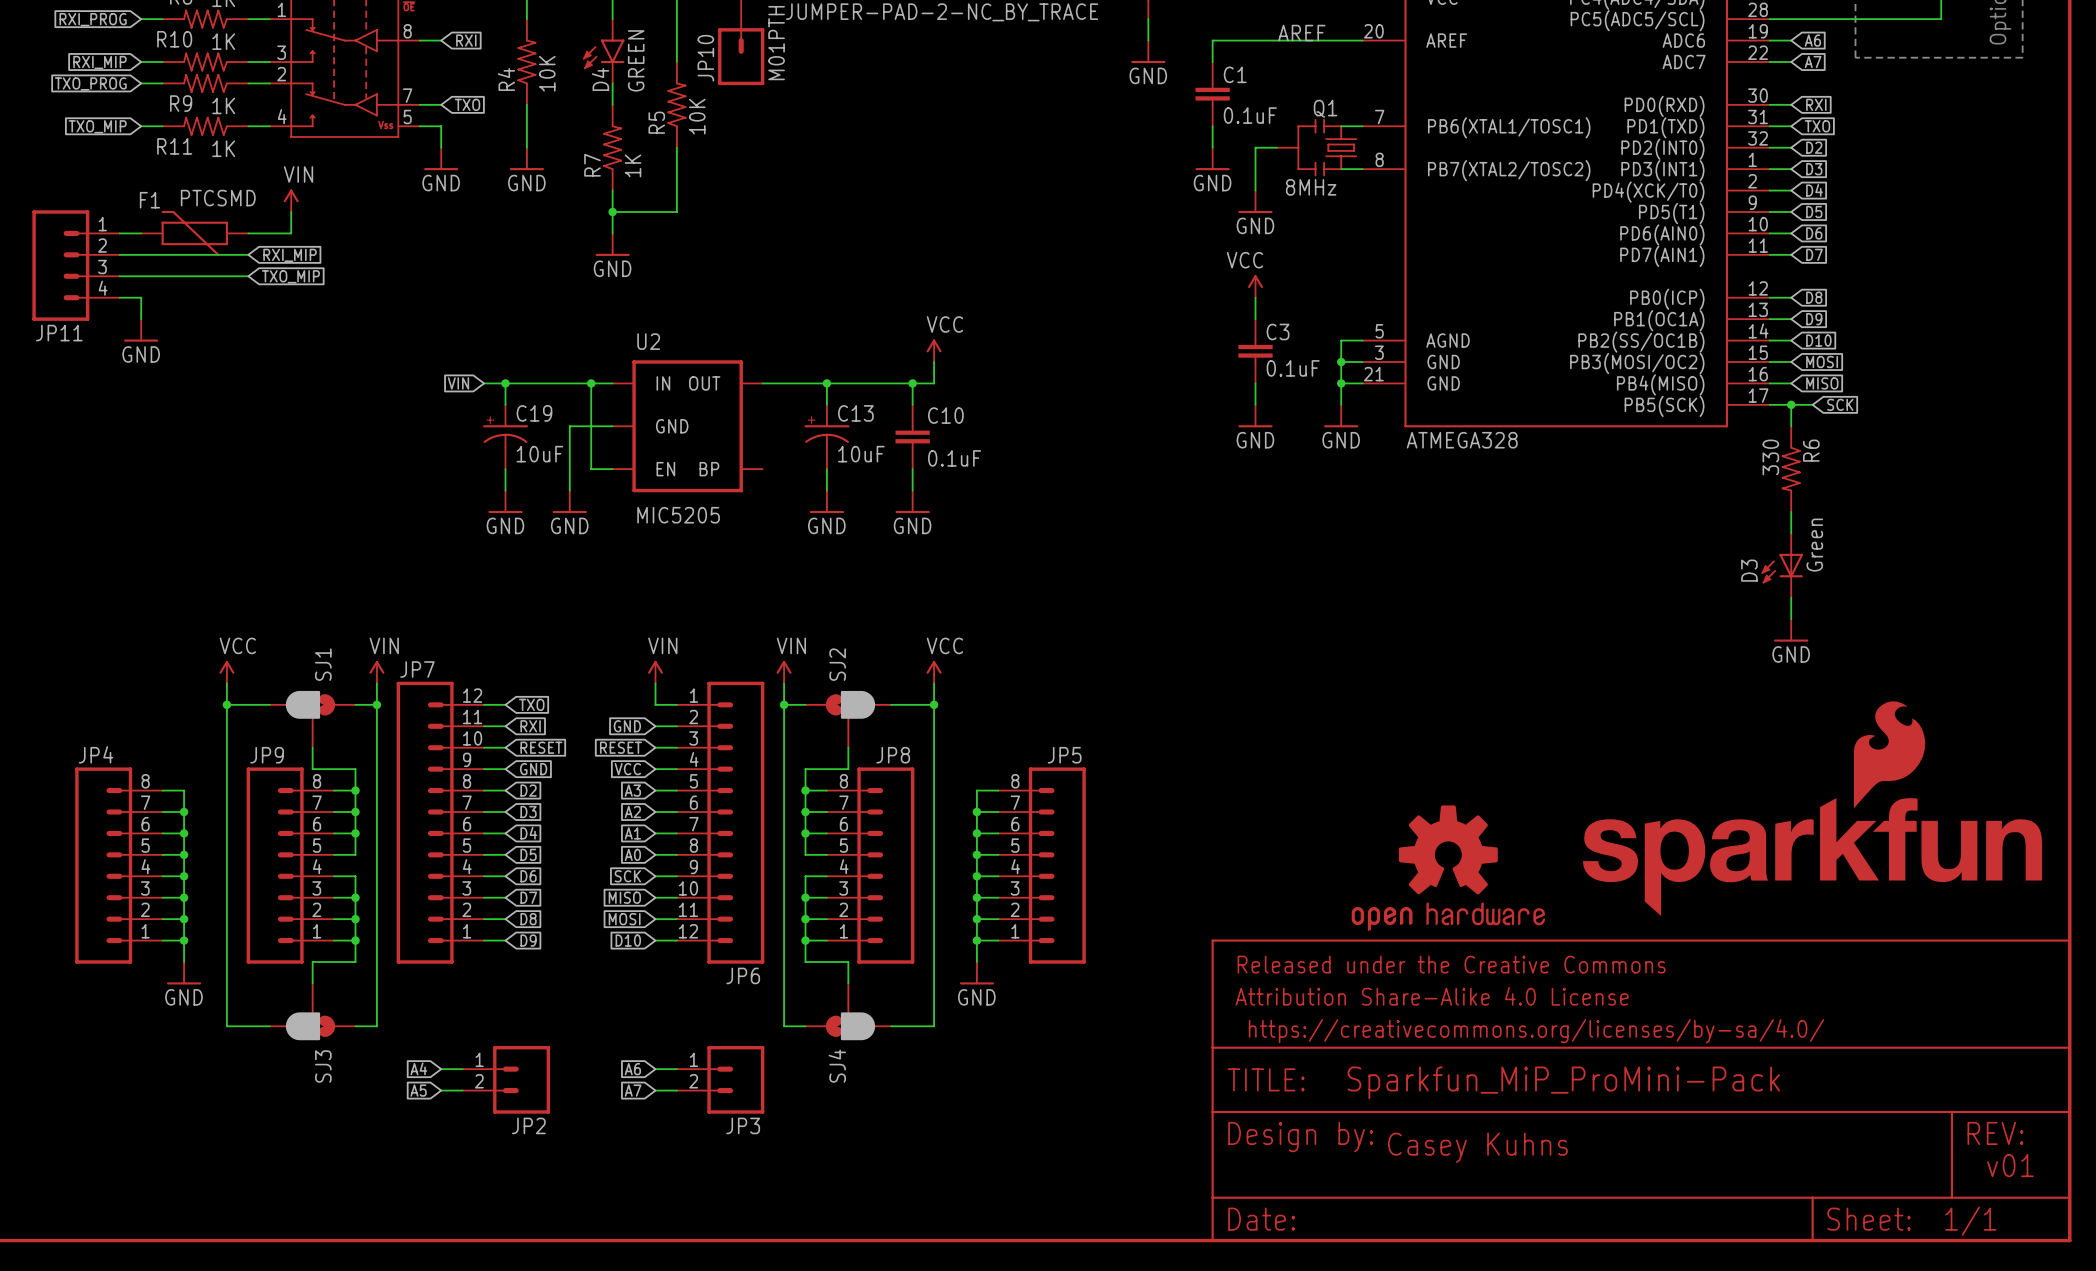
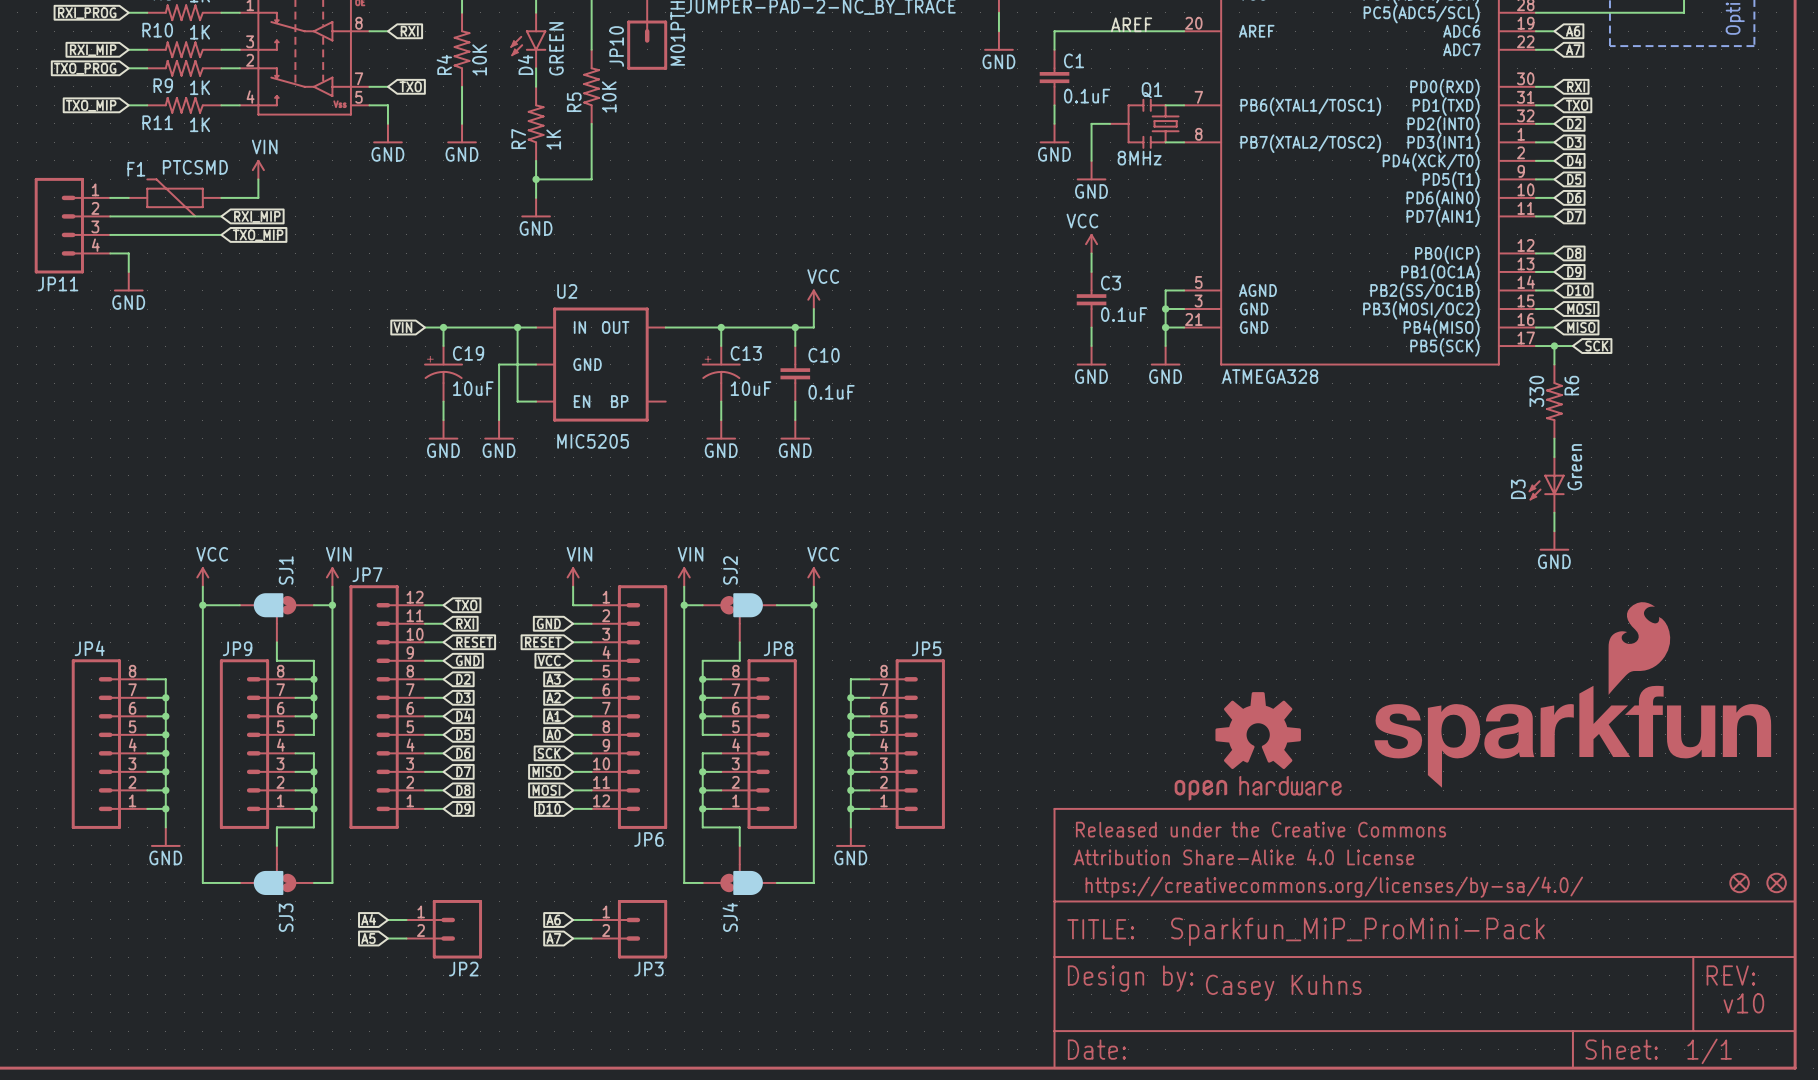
part: none -> (1739, 882)
part: none -> (1776, 882)
text: v01 (2010, 1165) -> v10 (1743, 1003)

